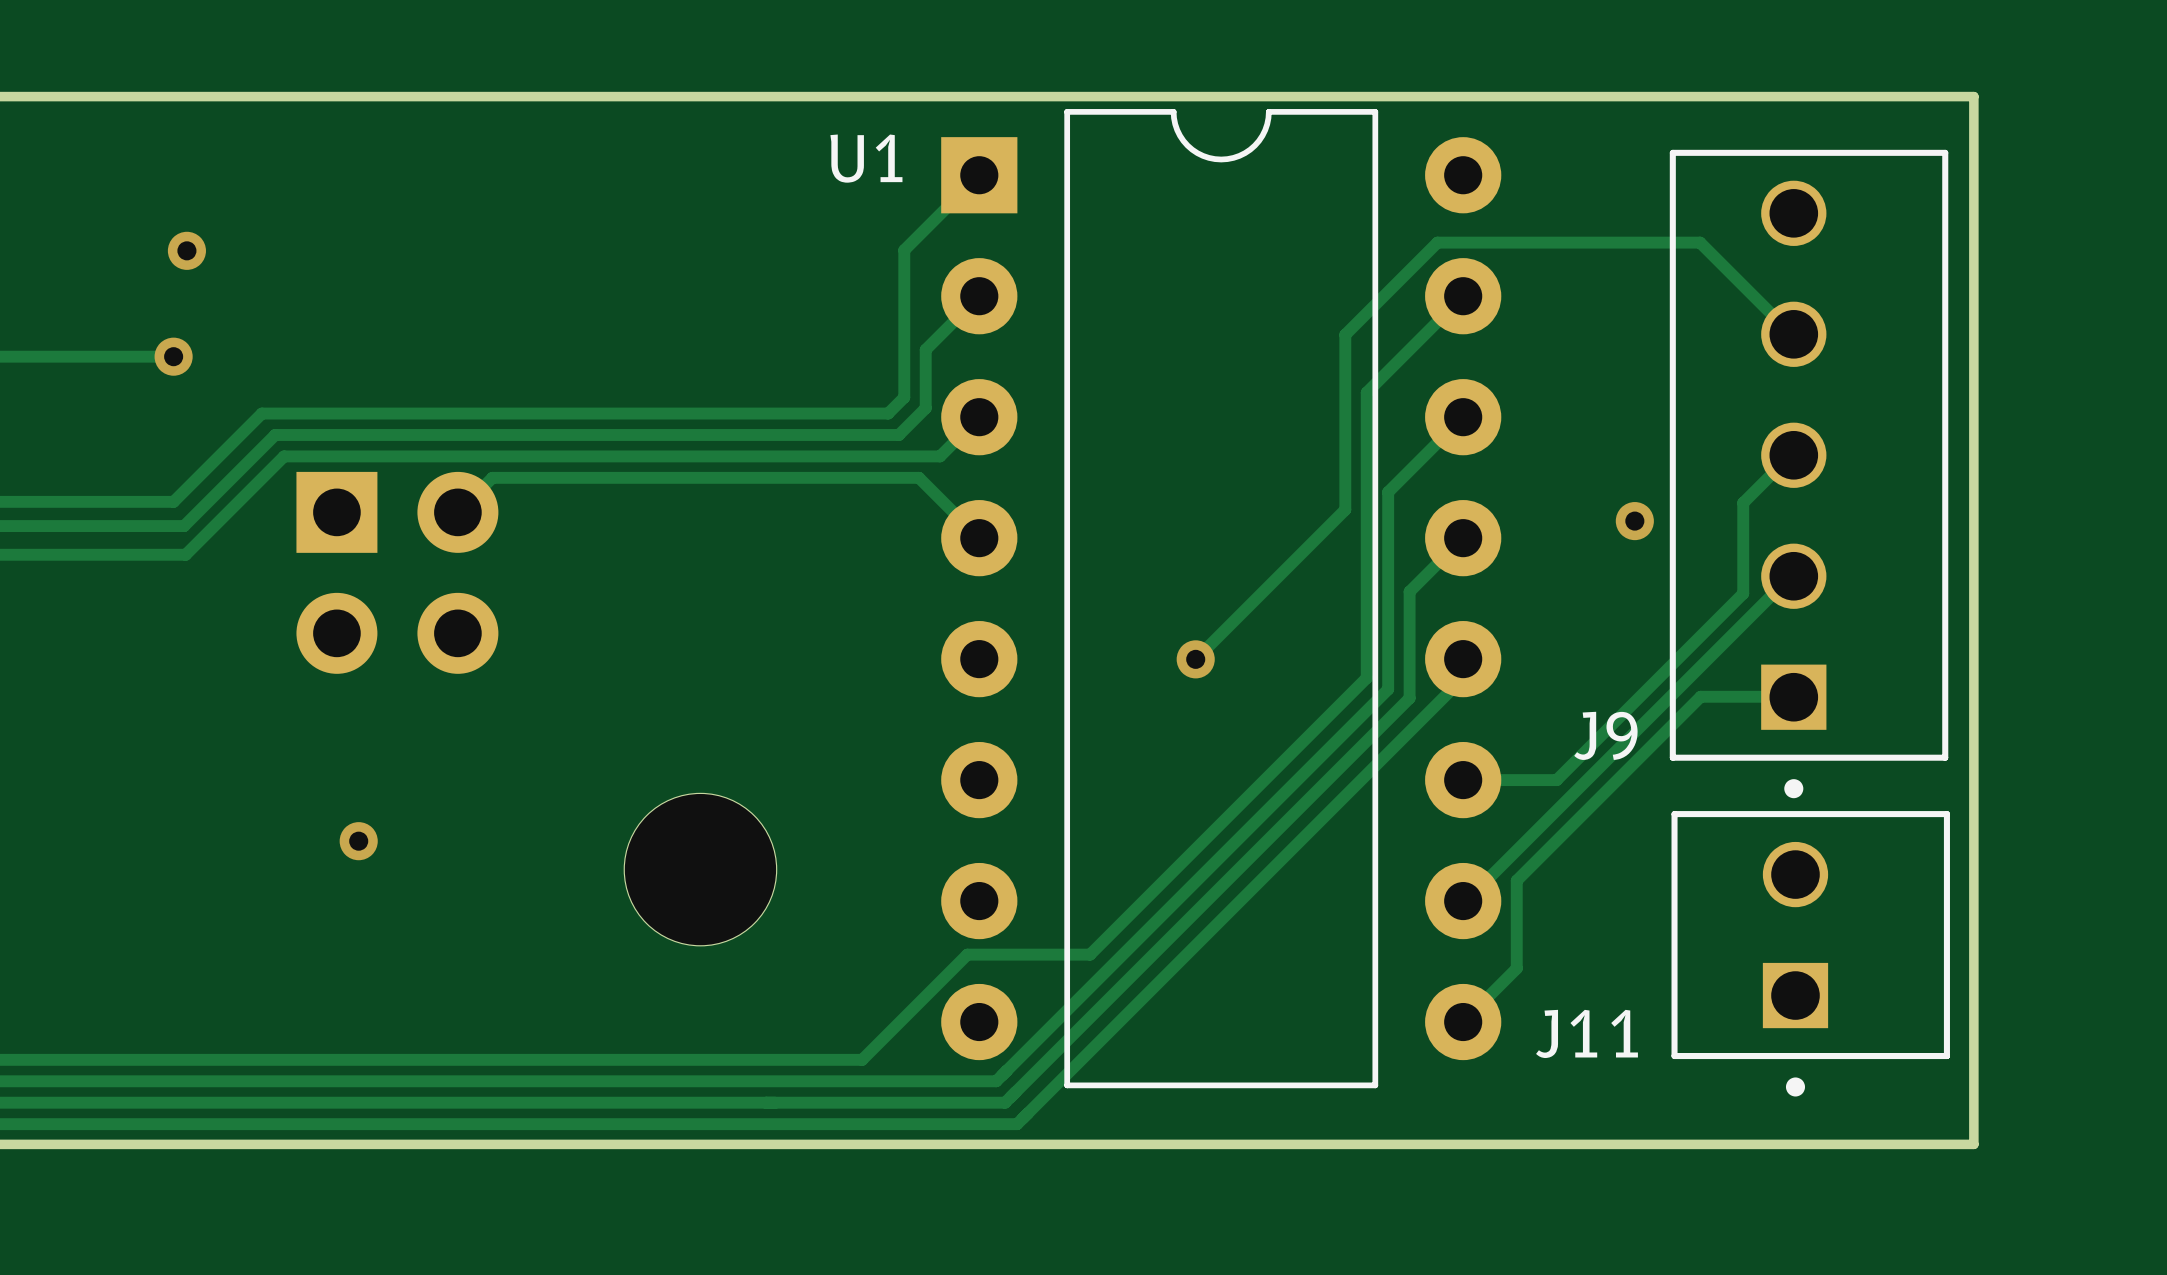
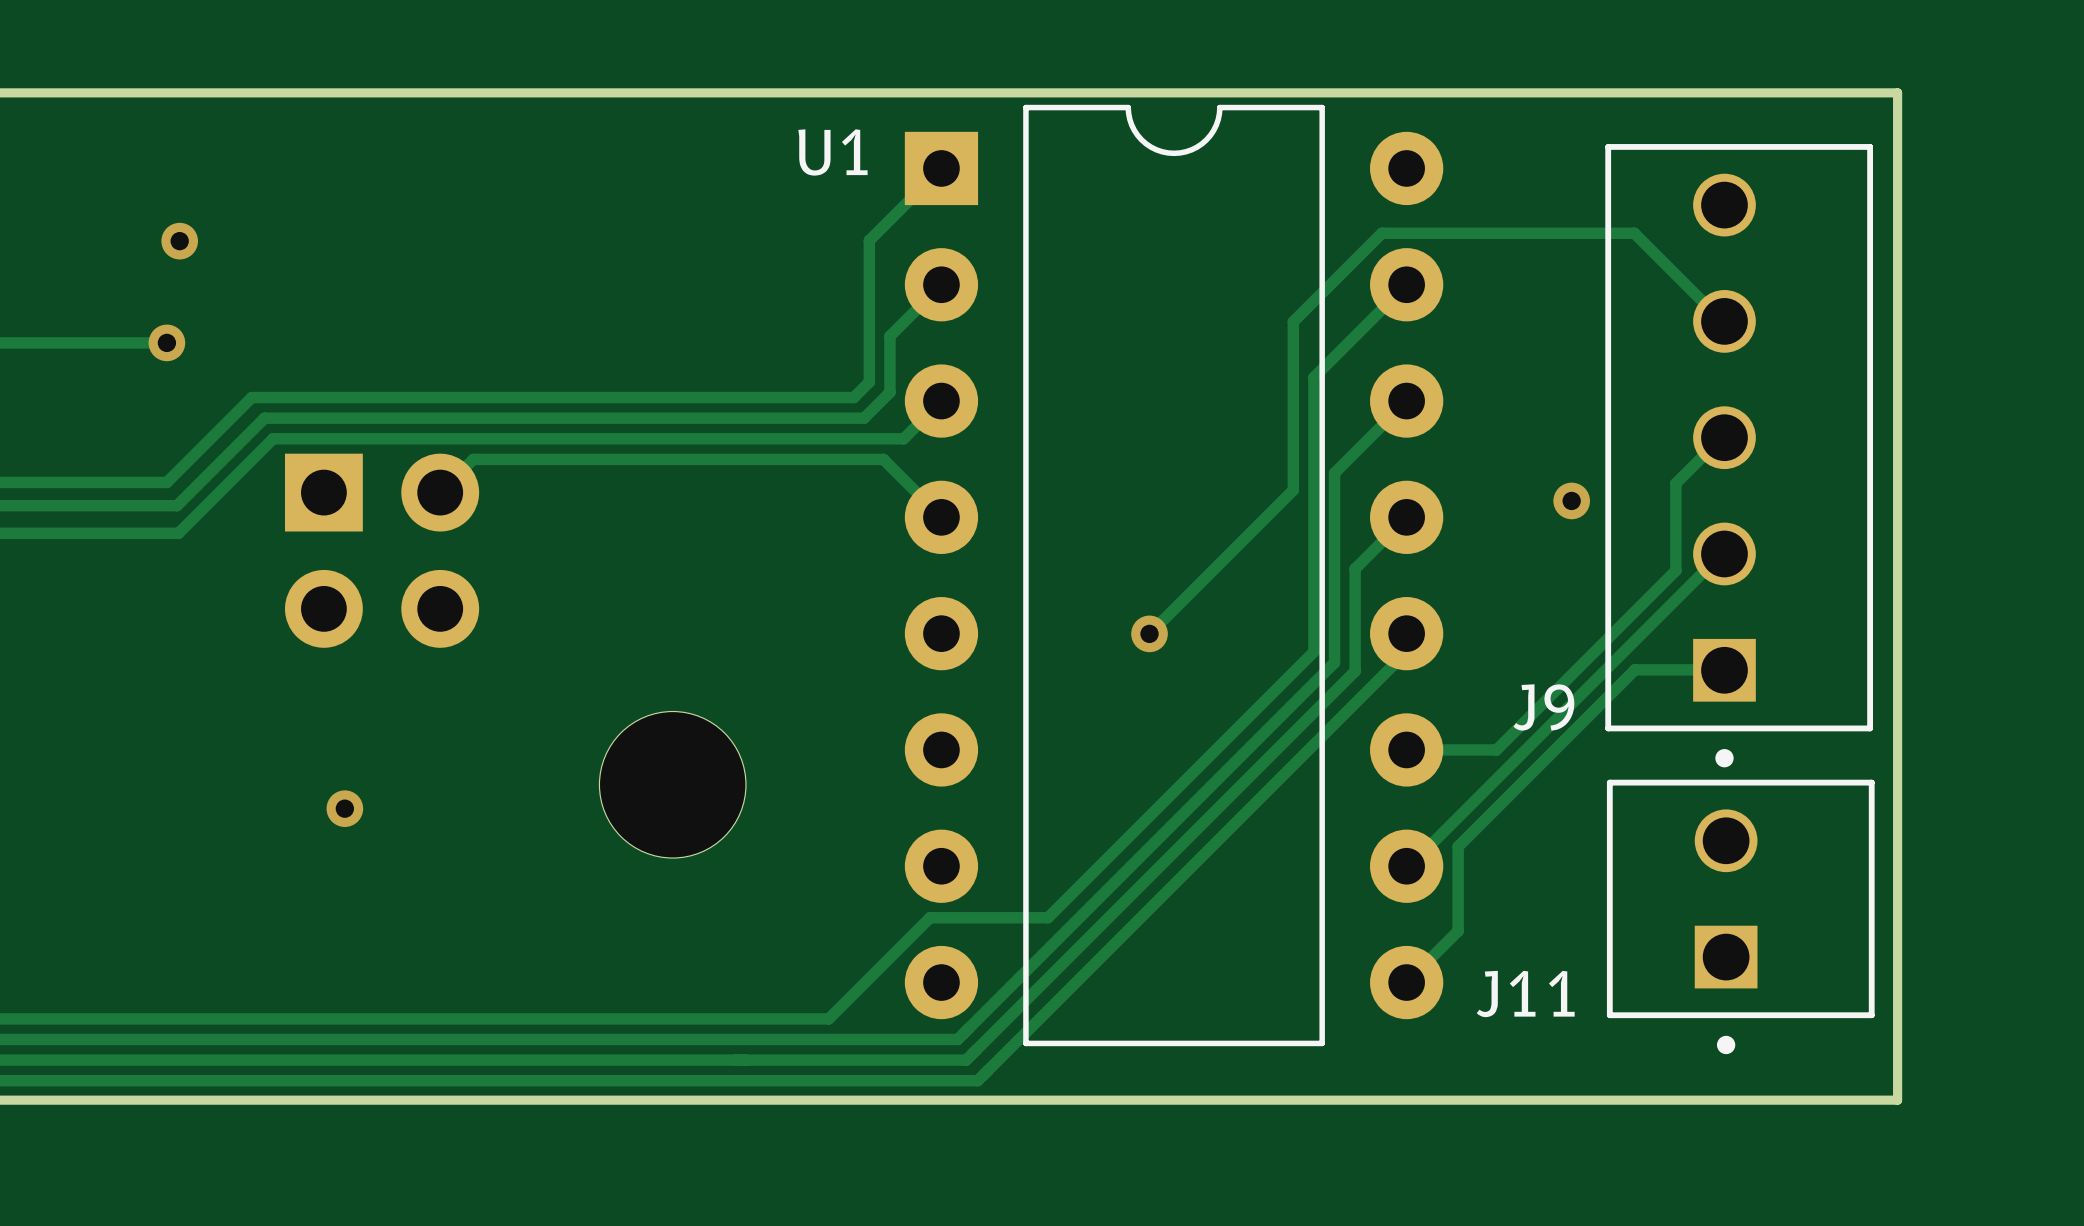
part position: (700, 869) -> (672, 784)

